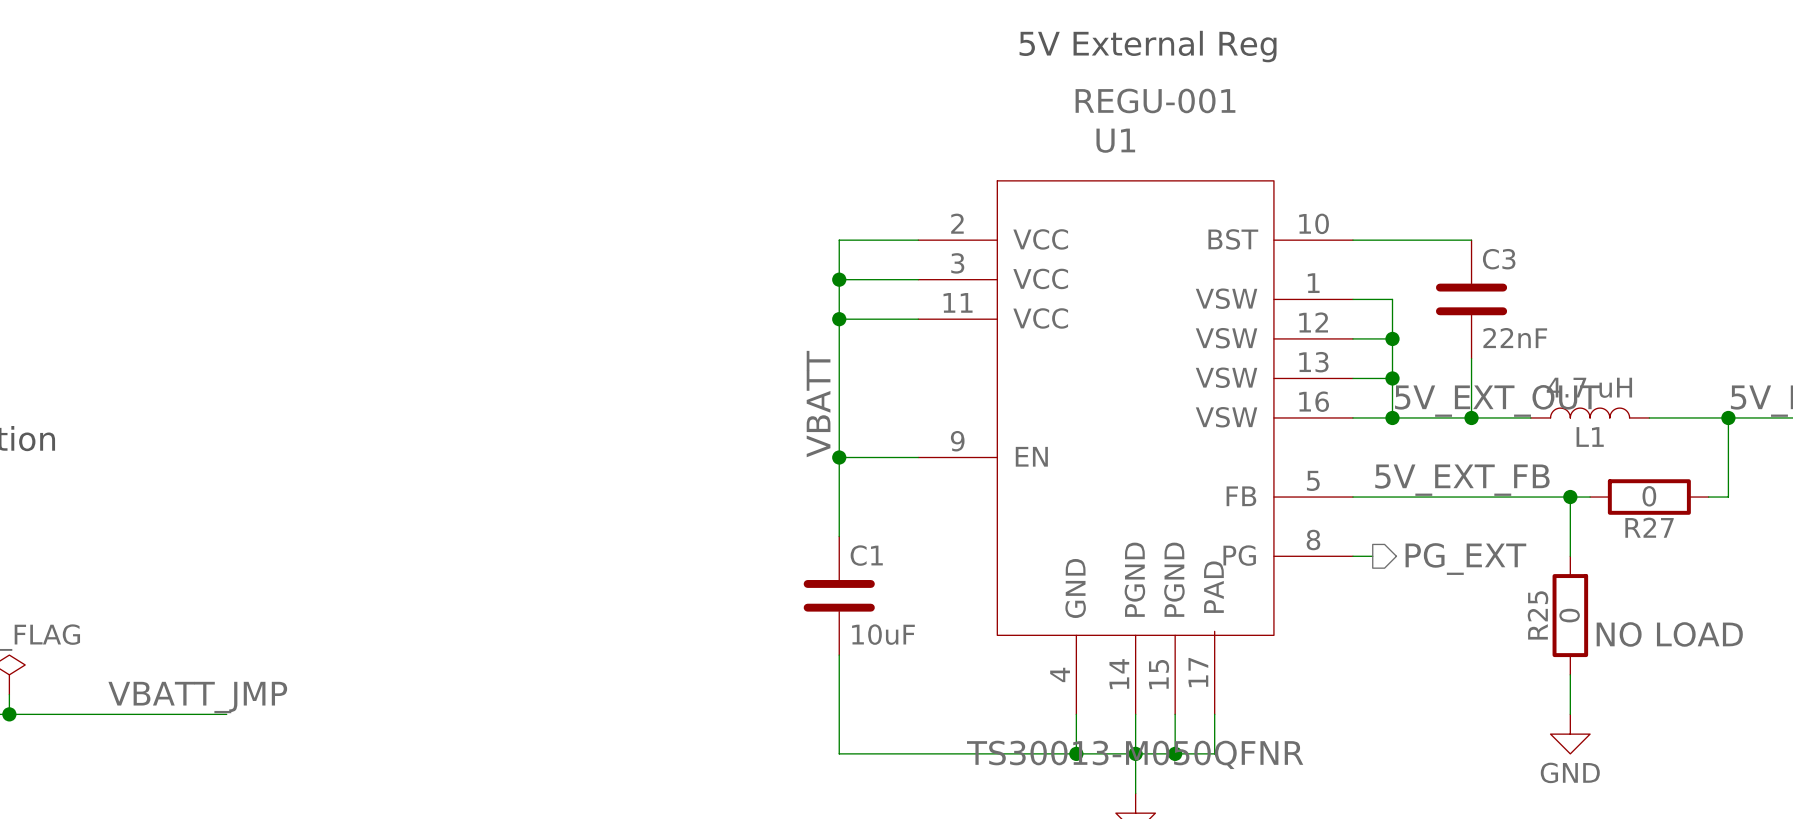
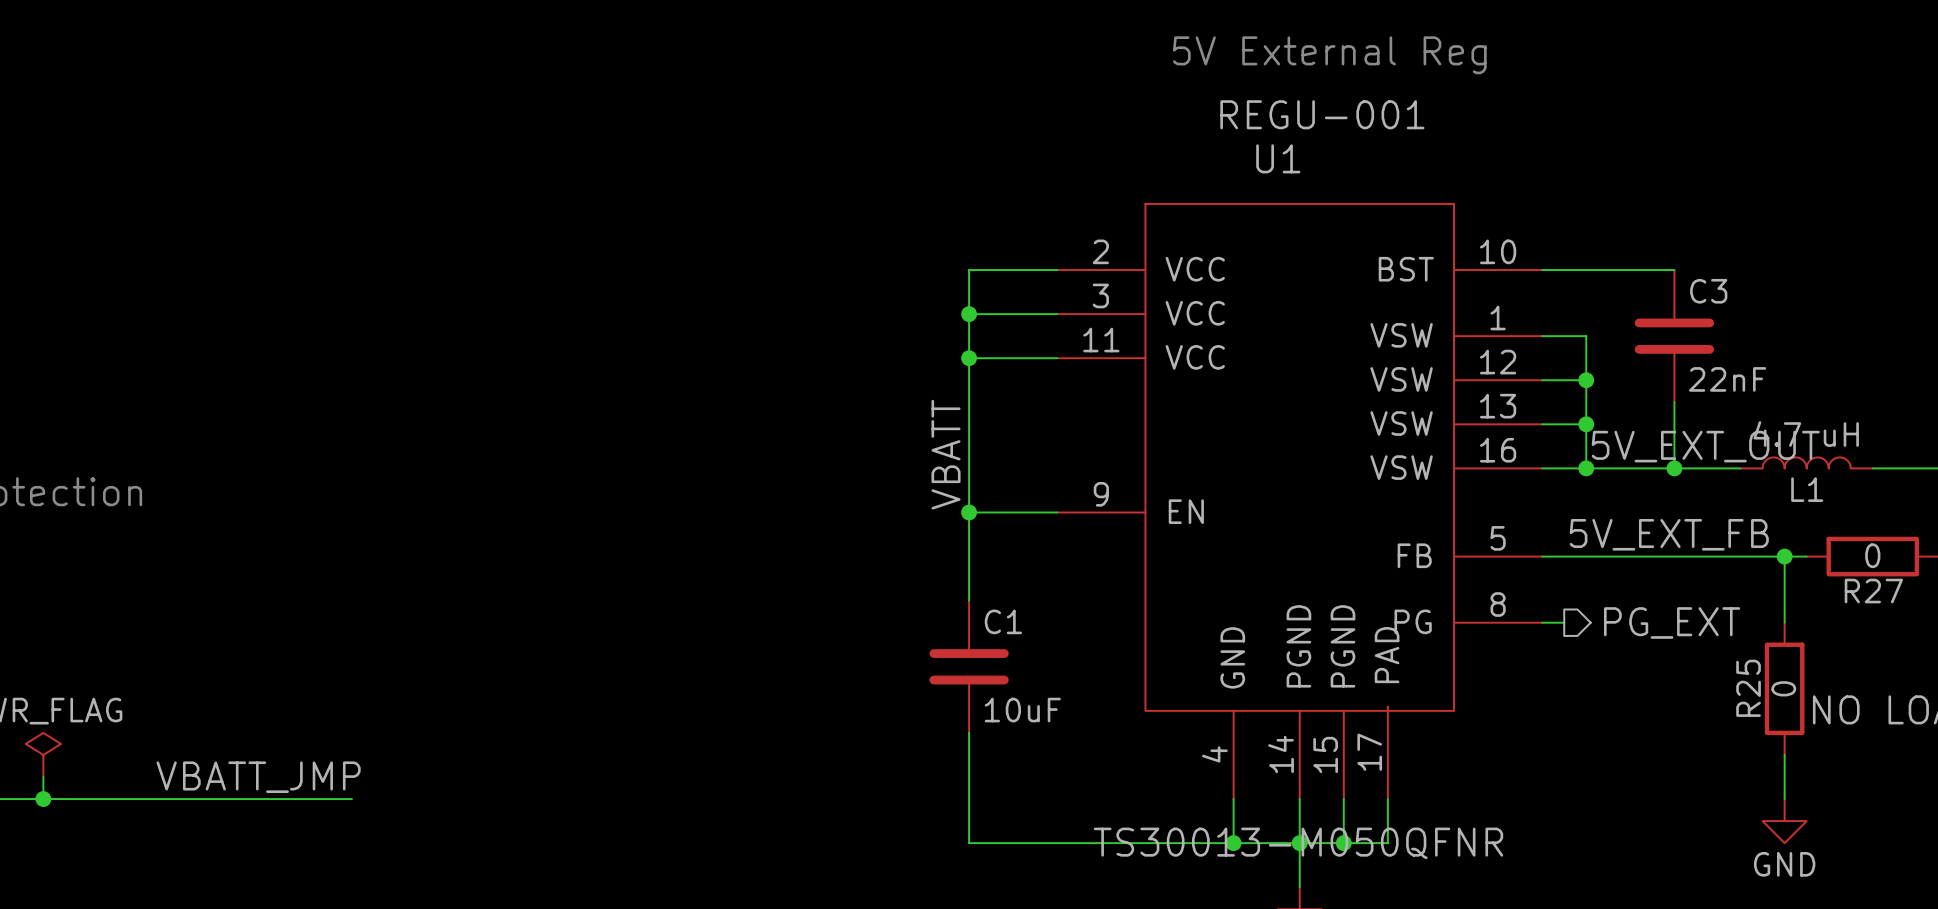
wire: none -> (285, 799) (351, 799)

